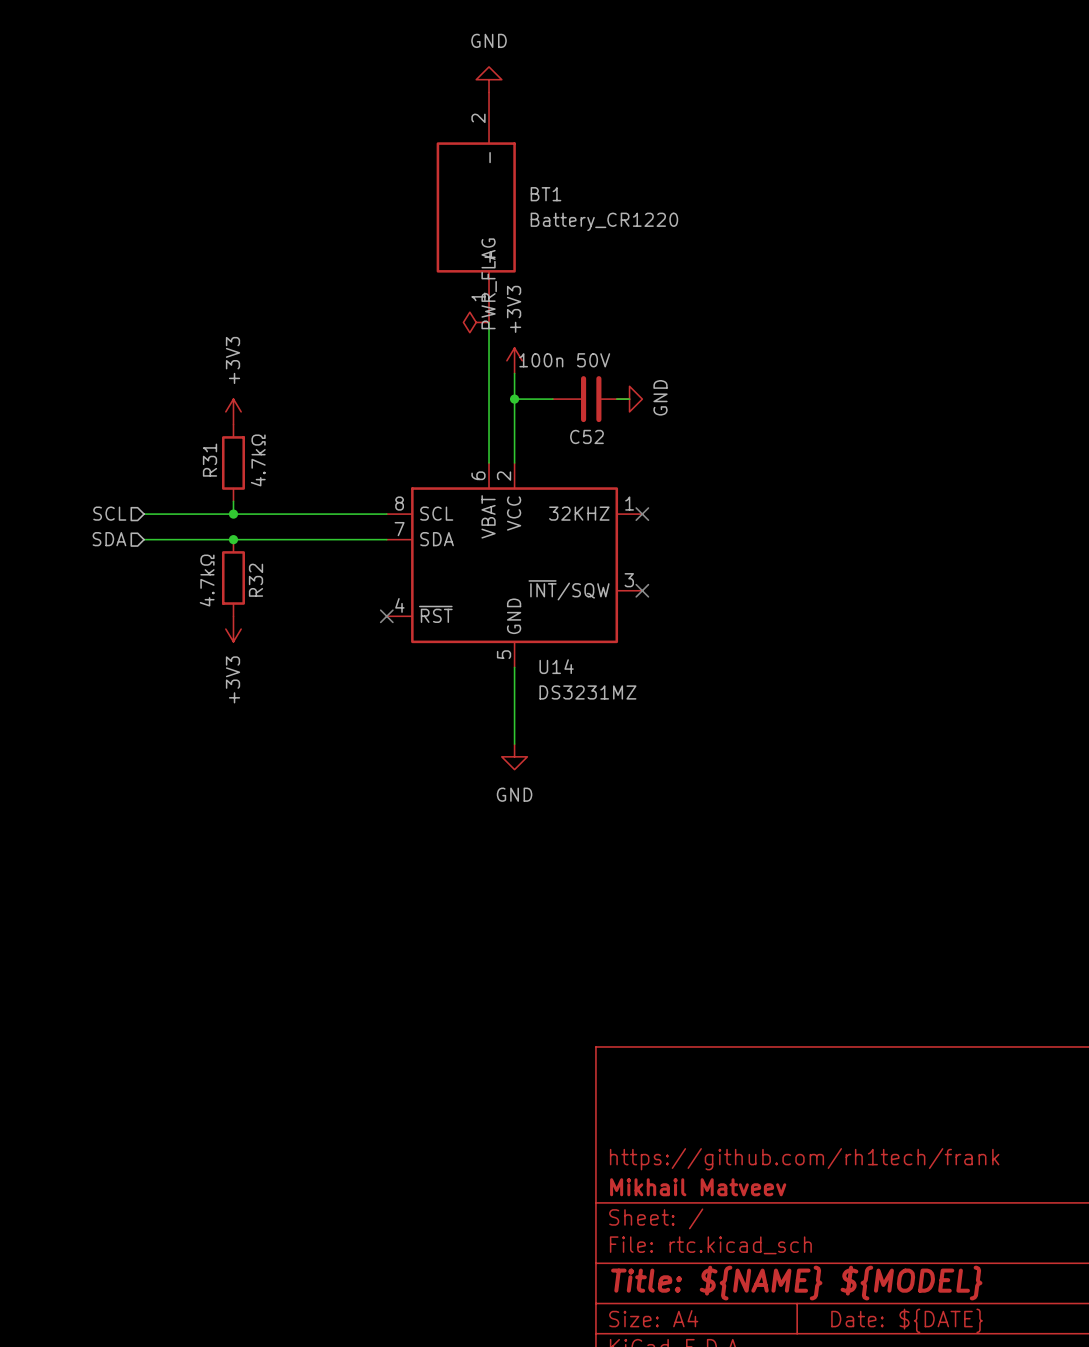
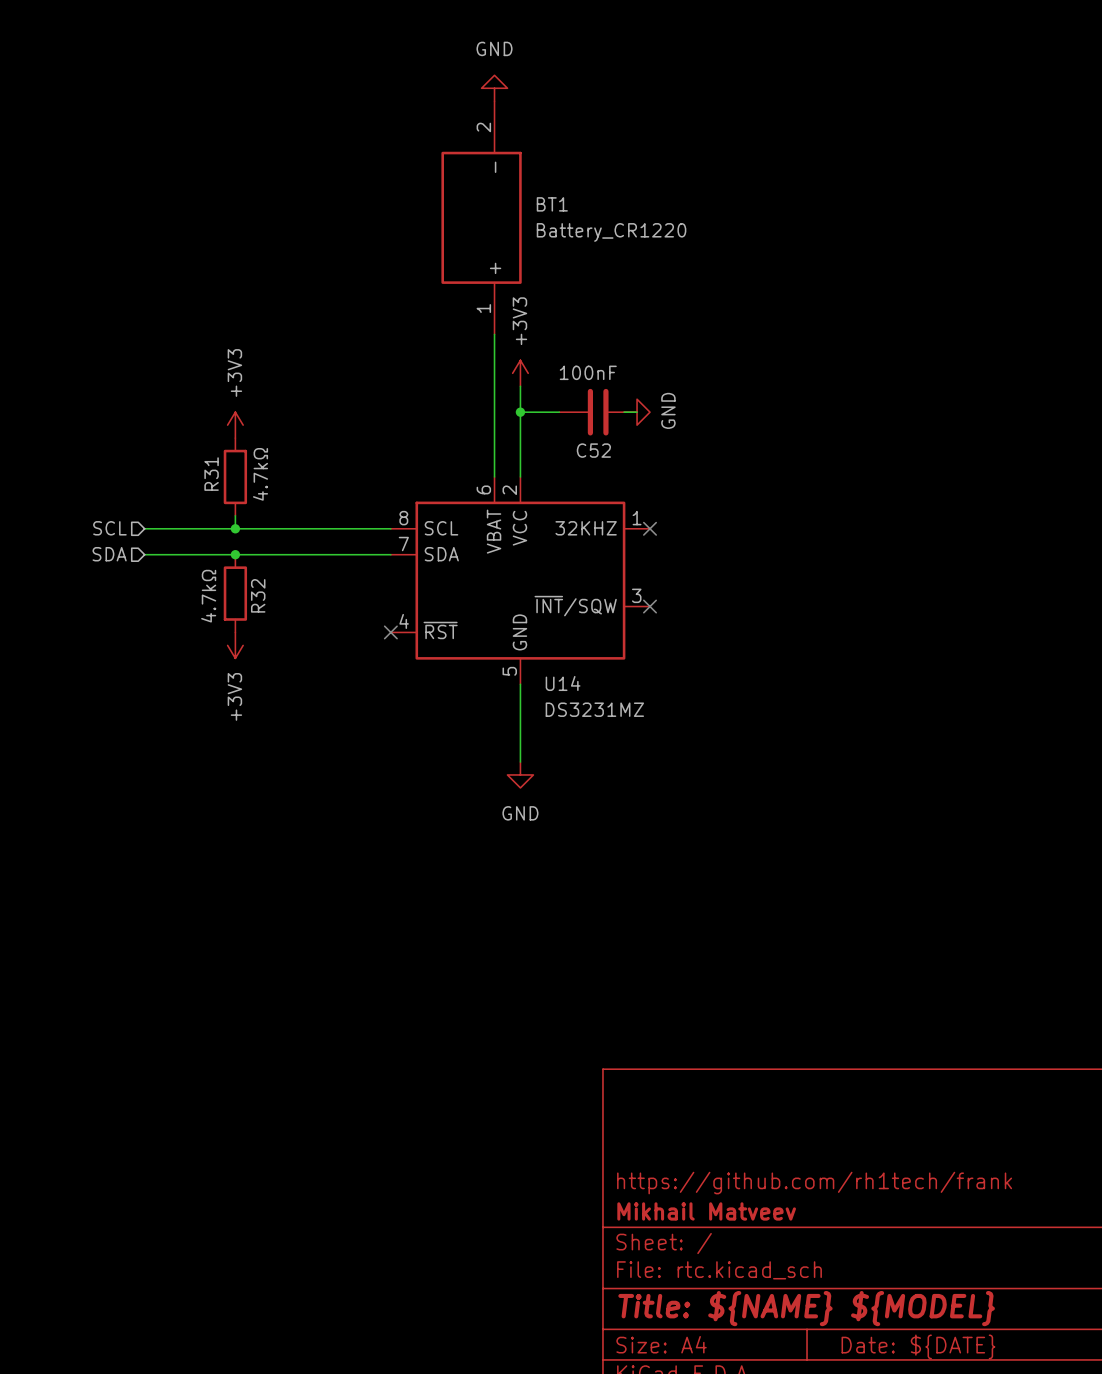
power symbol: PWR_FLAG (476, 322) -> none
C52 value: 100n 50V (564, 360) -> 100nF (588, 372)

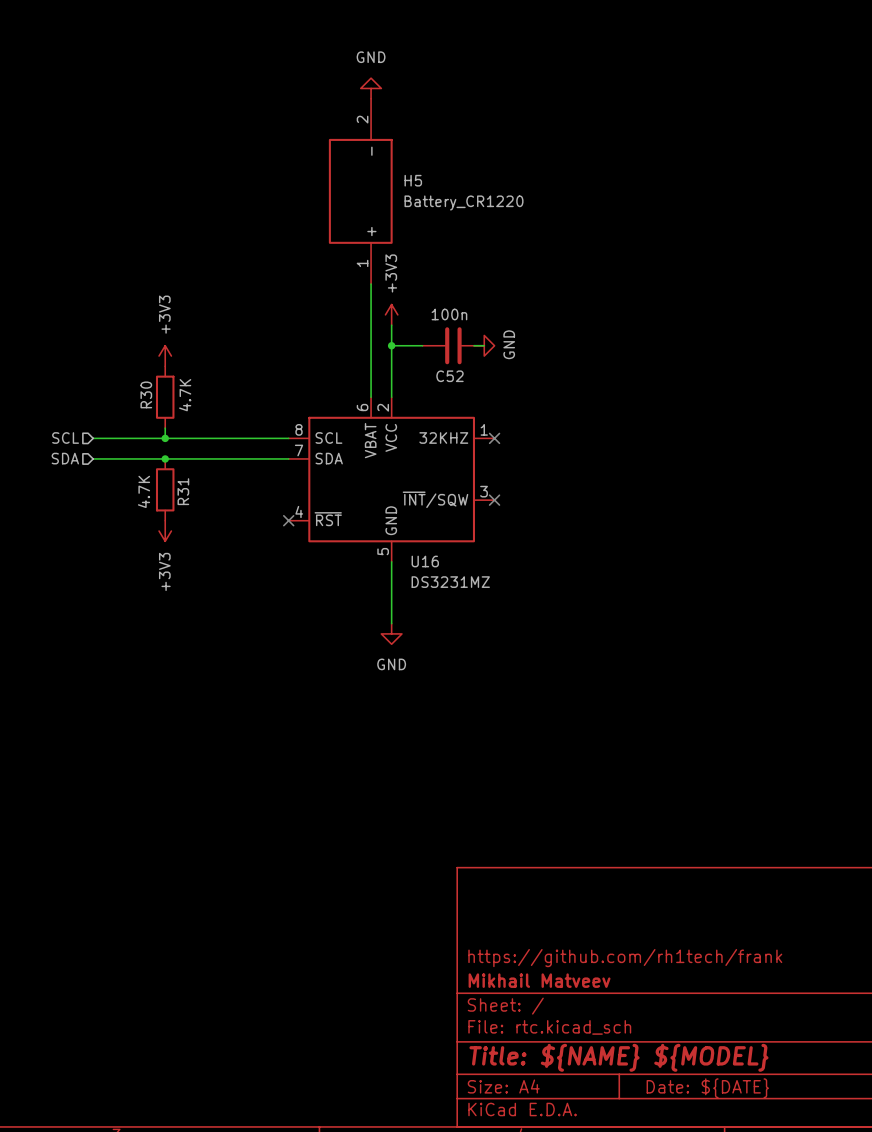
BT1 name: BT1 (552, 204) -> H5 (413, 180)
C52 value: 100nF (588, 372) -> 100n (449, 314)
R31 name: R31 (211, 474) -> R30 (146, 394)
R31 value: 4.7kΩ (260, 474) -> 4.7K (185, 395)
R32 name: R32 (258, 595) -> R31 (183, 491)
R32 value: 4.7kΩ (208, 596) -> 4.7K (144, 491)
U14 name: U14 (563, 683) -> U16 (425, 561)

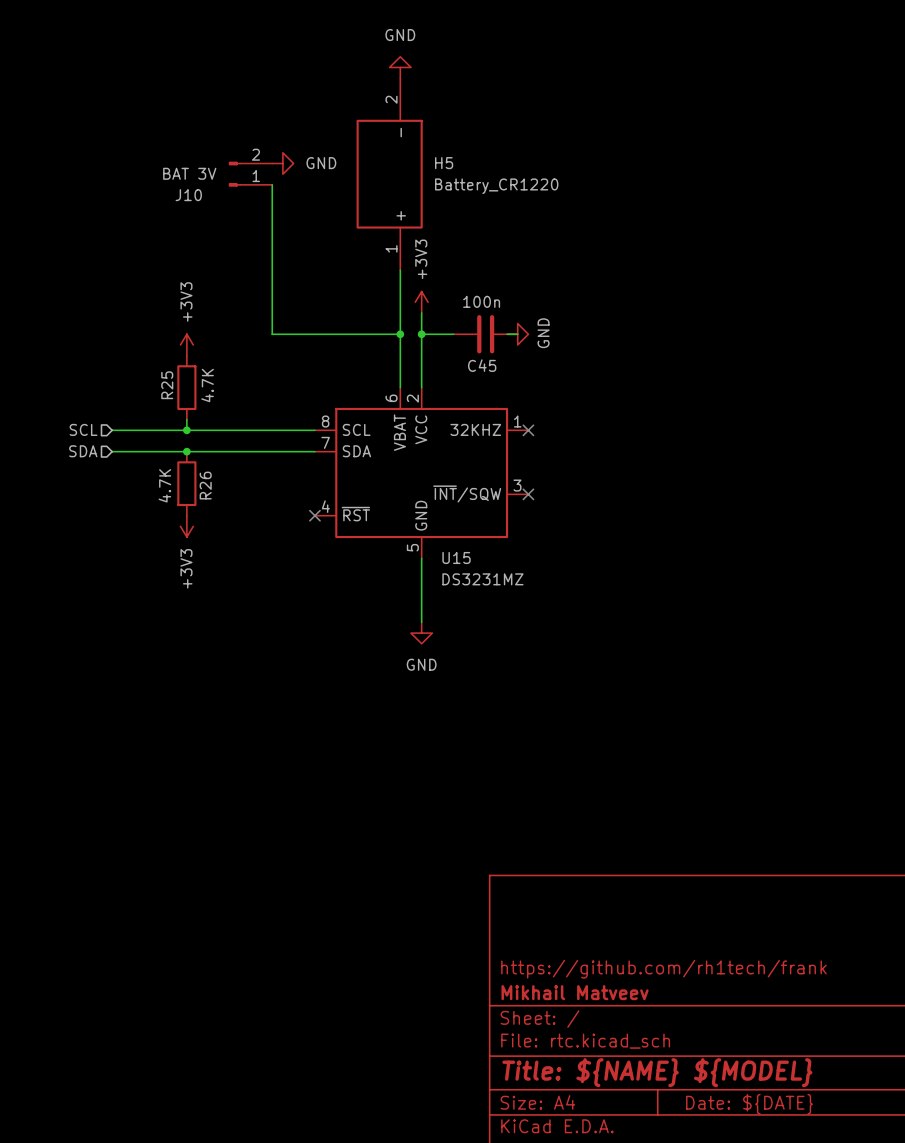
power symbol: none -> GND (282, 163)
J10: none -> BAT 3V (250, 174)
wire: none -> (272, 184) (272, 334) (400, 334)
junction: none -> (400, 334)
C52 name: C52 (449, 376) -> C45 (482, 365)
R30 name: R30 (146, 394) -> R25 (167, 385)
R31 name: R31 (183, 491) -> R26 (205, 485)
U16 name: U16 (425, 561) -> U15 (456, 557)

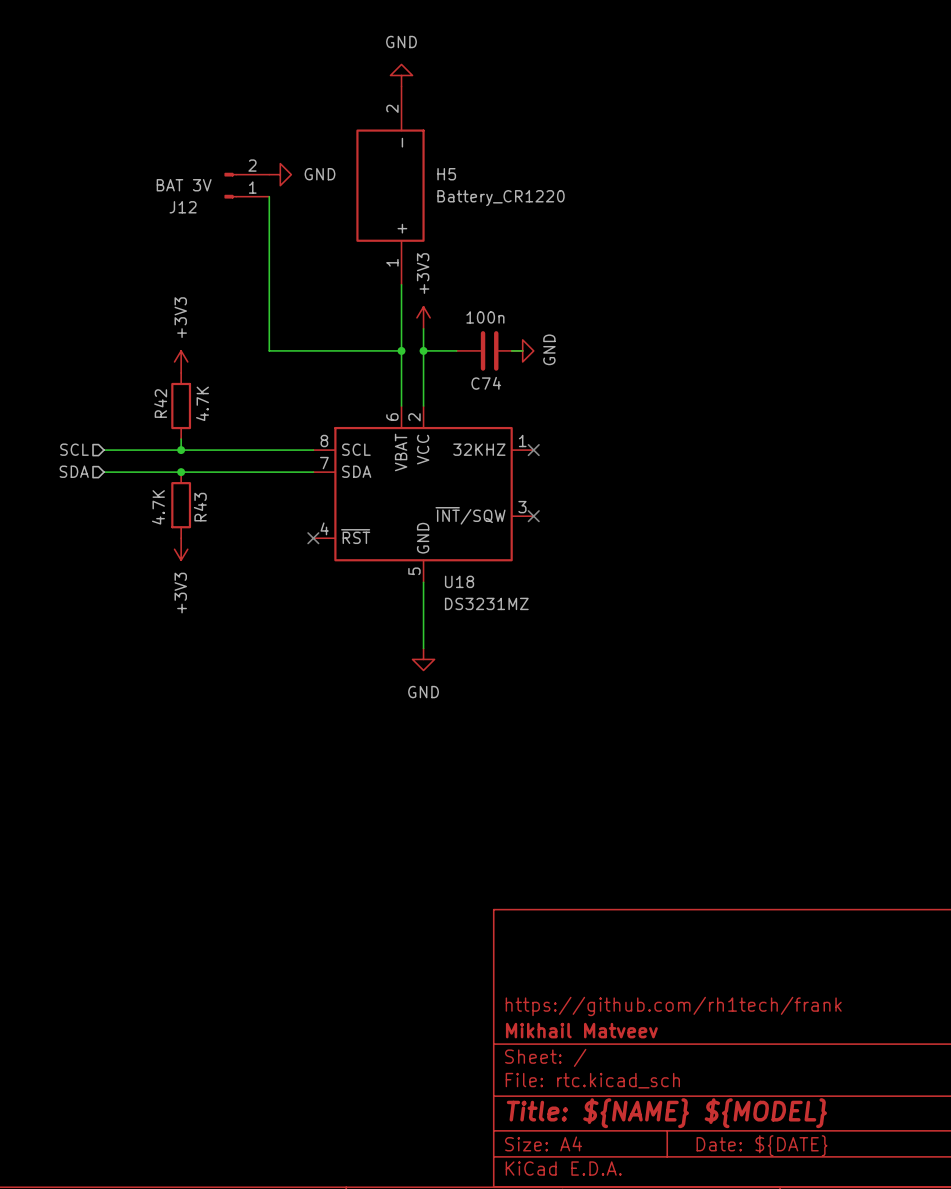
J10 name: J10 (188, 195) -> J12 (183, 207)
C45 name: C45 (482, 365) -> C74 (486, 383)
R25 name: R25 (167, 385) -> R42 (160, 403)
R26 name: R26 (205, 485) -> R43 (200, 507)
U15 name: U15 (456, 557) -> U18 (459, 581)

